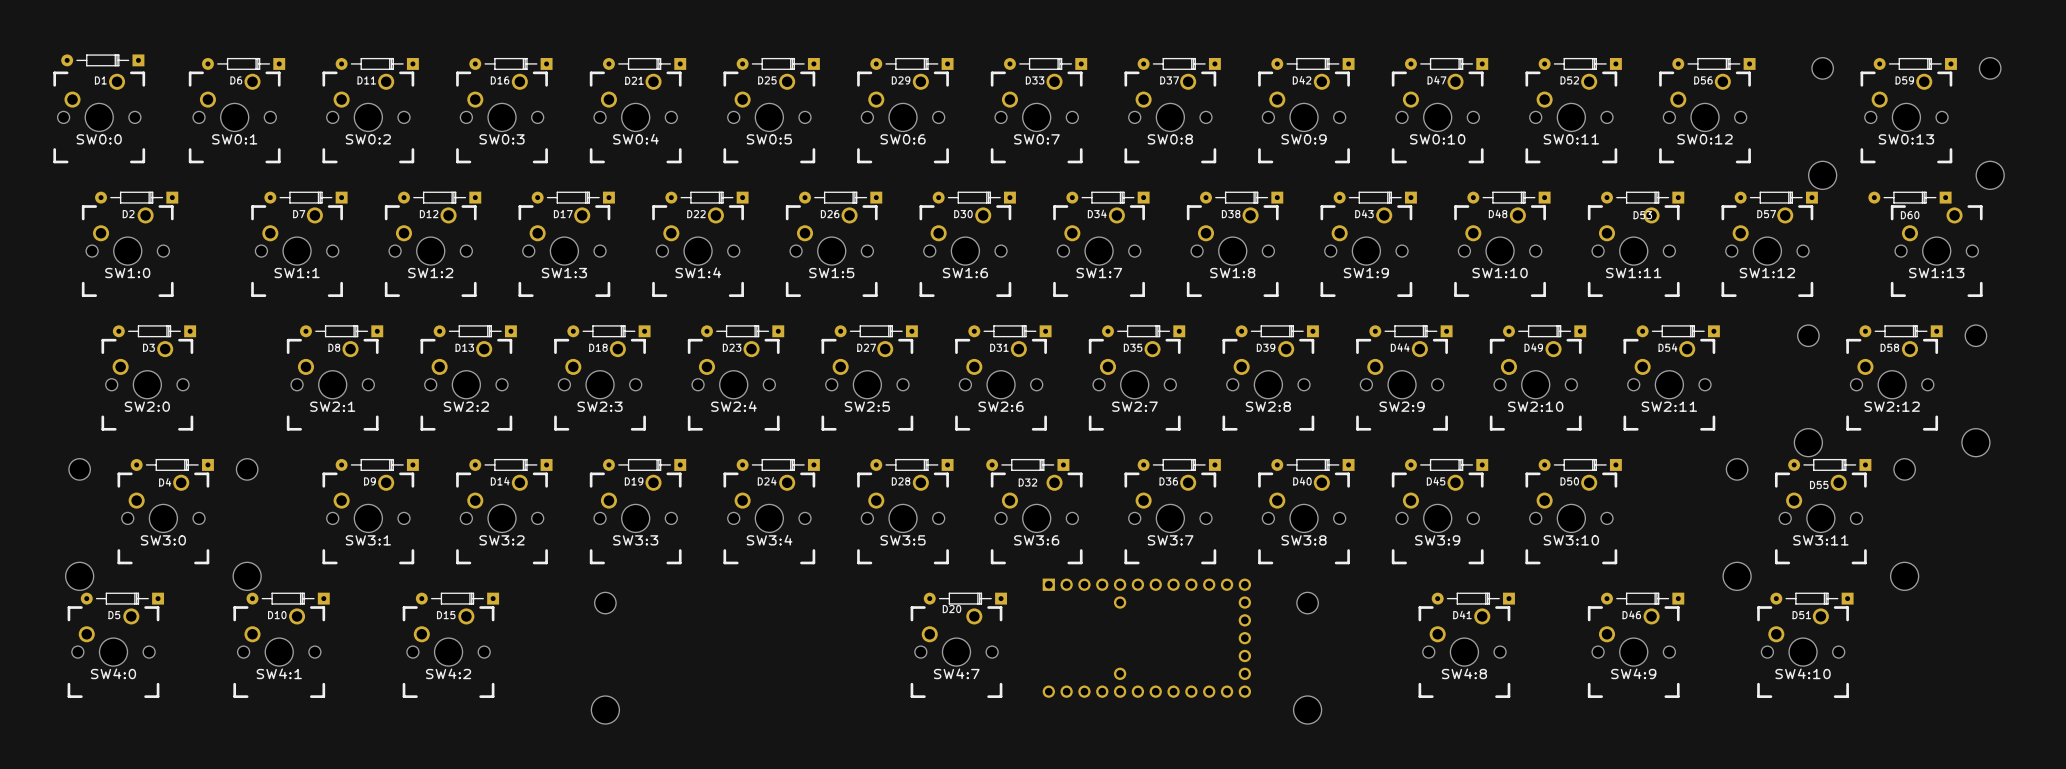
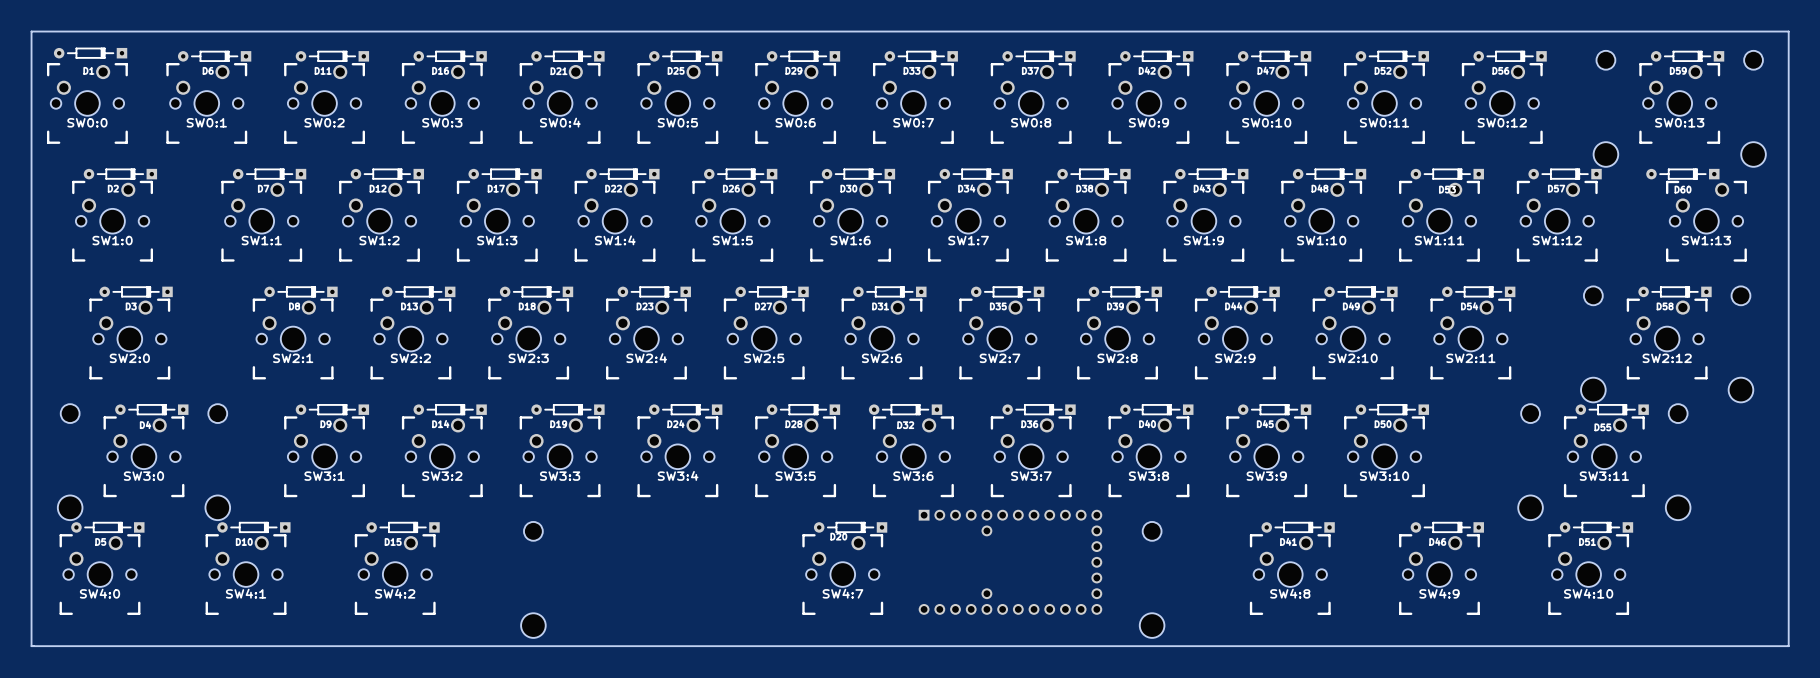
board edge: none -> (33, 646) (31, 646) (31, 31) (1788, 31) (1788, 646) (34, 646)

